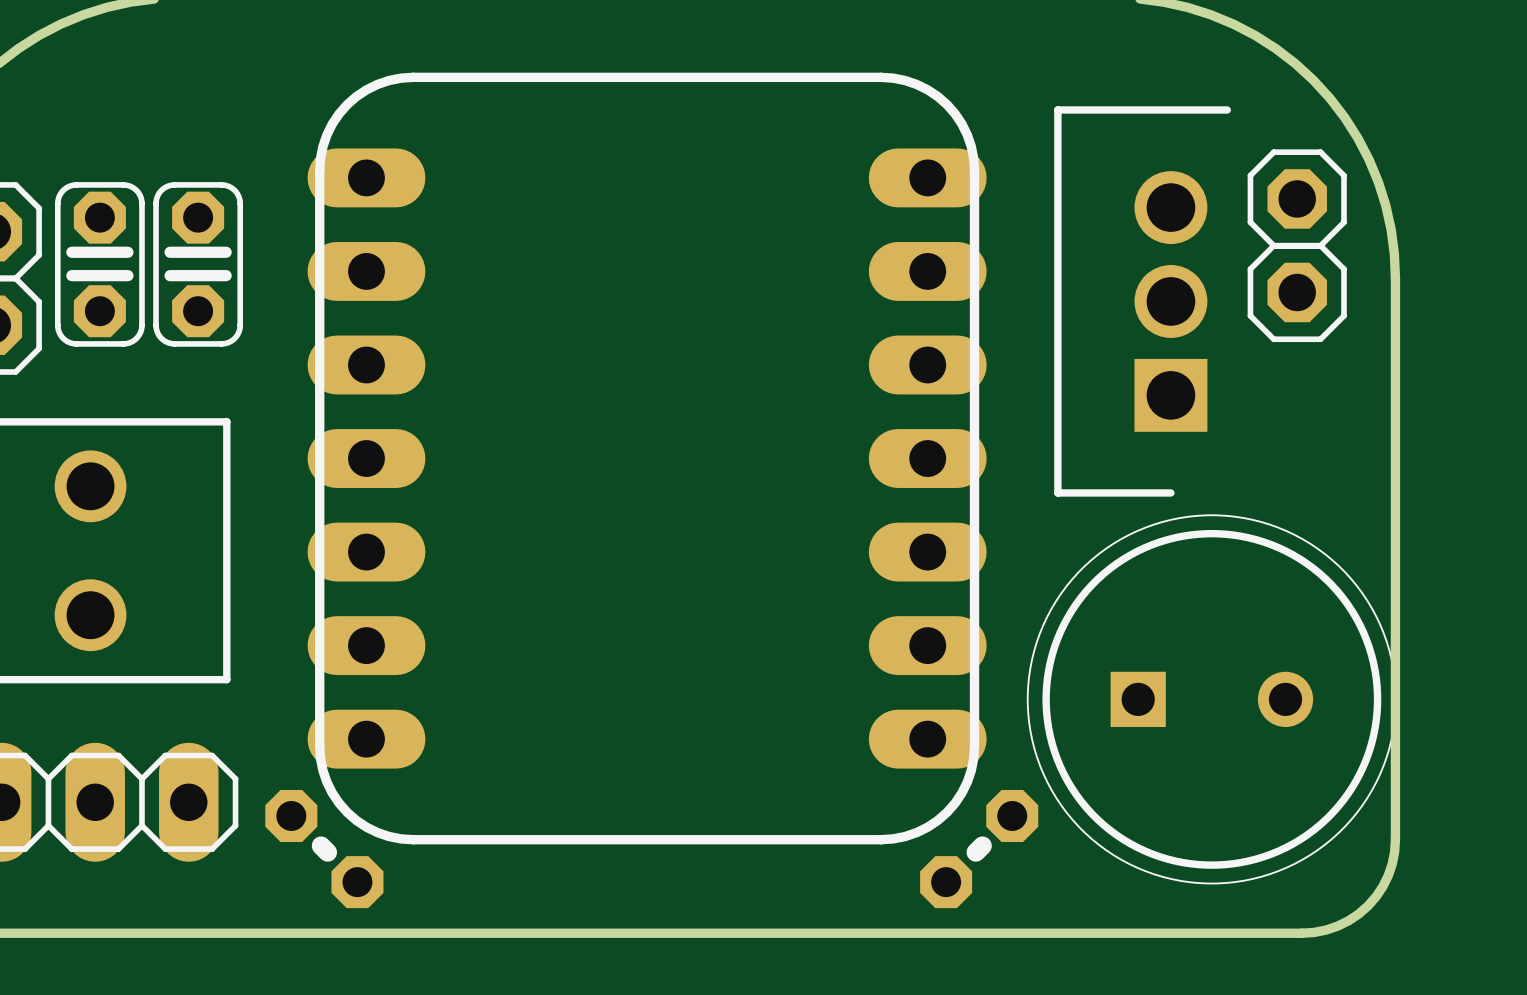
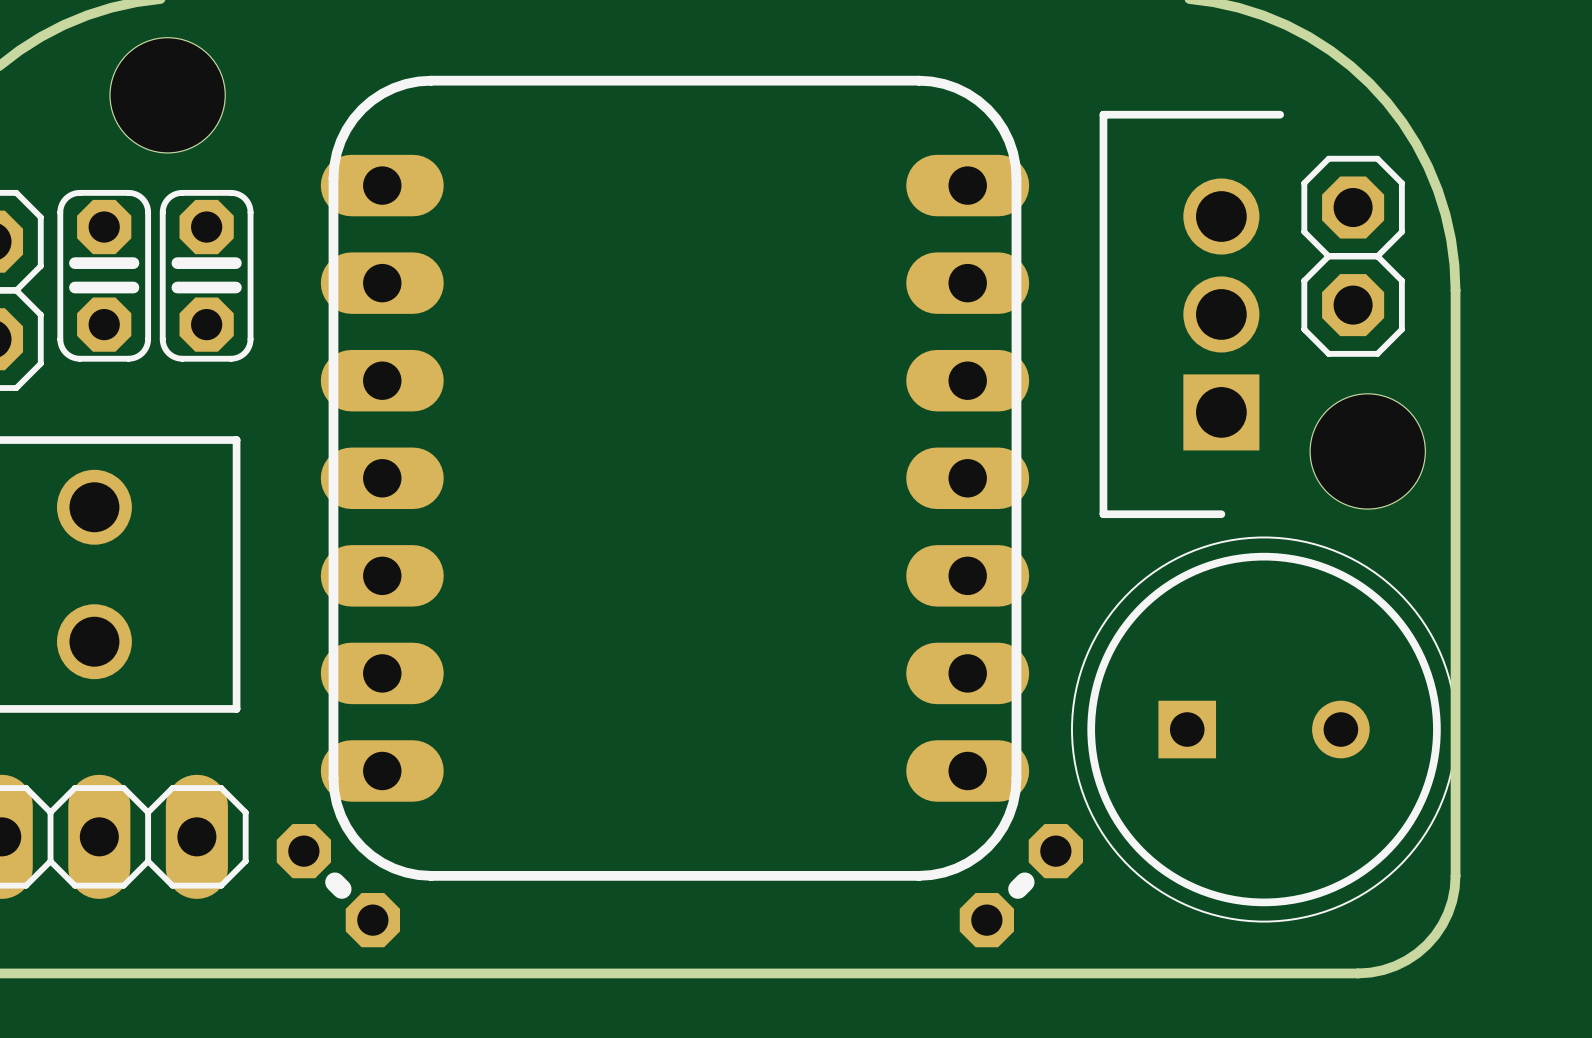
hole: none -> (167, 95)
hole: none -> (1367, 451)

